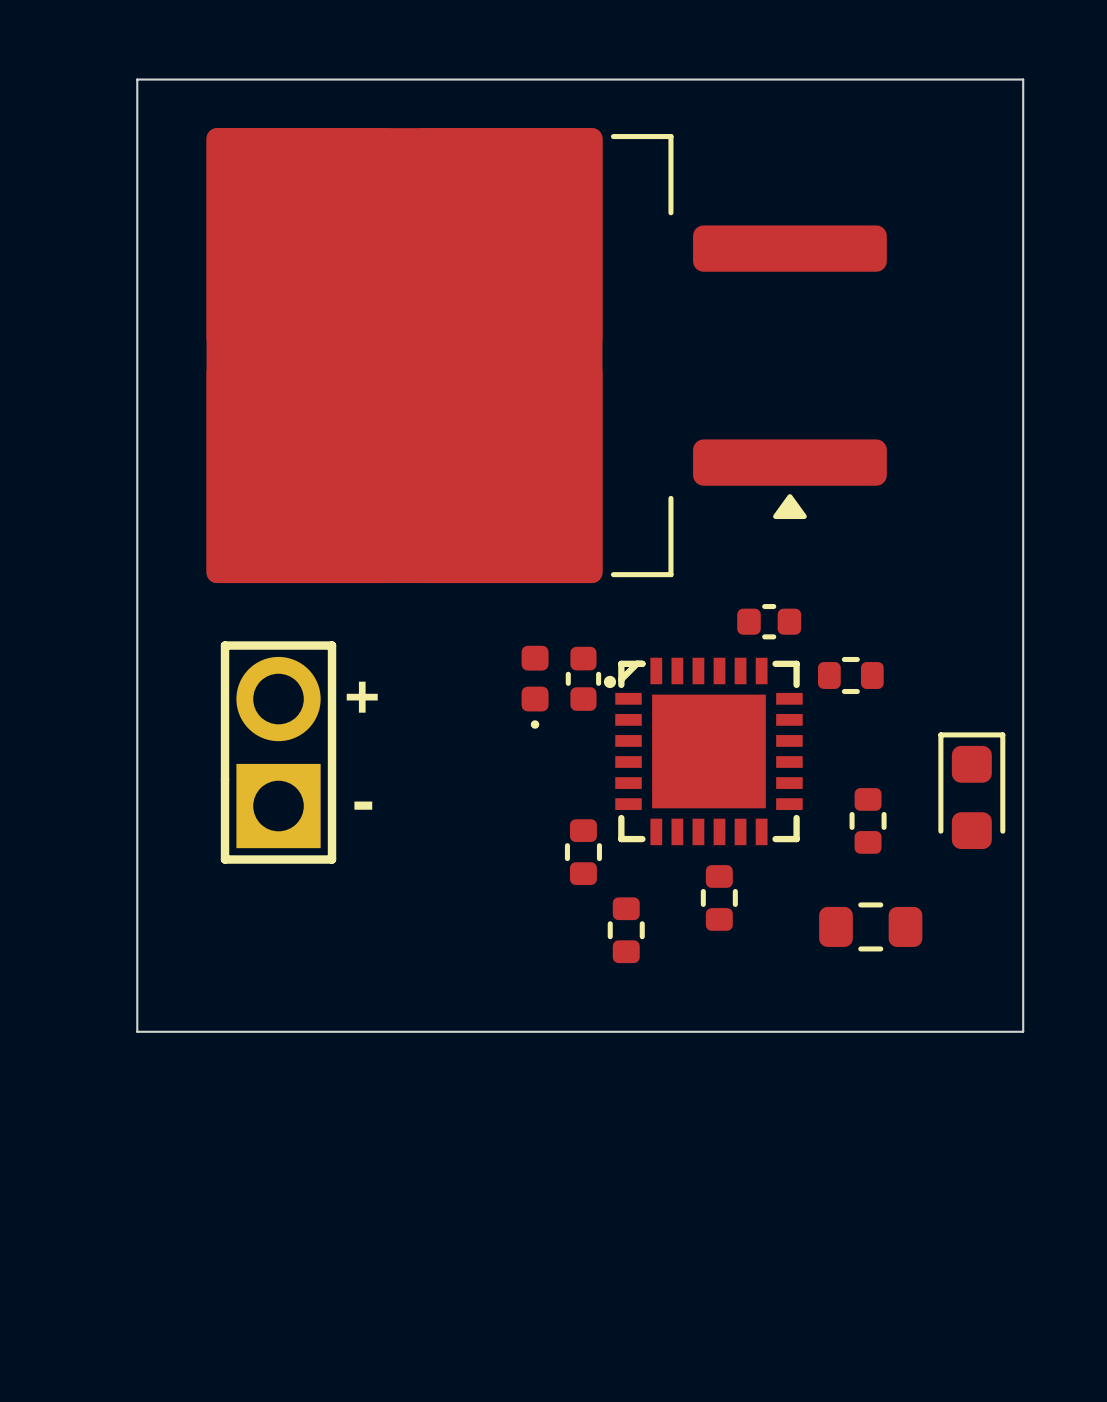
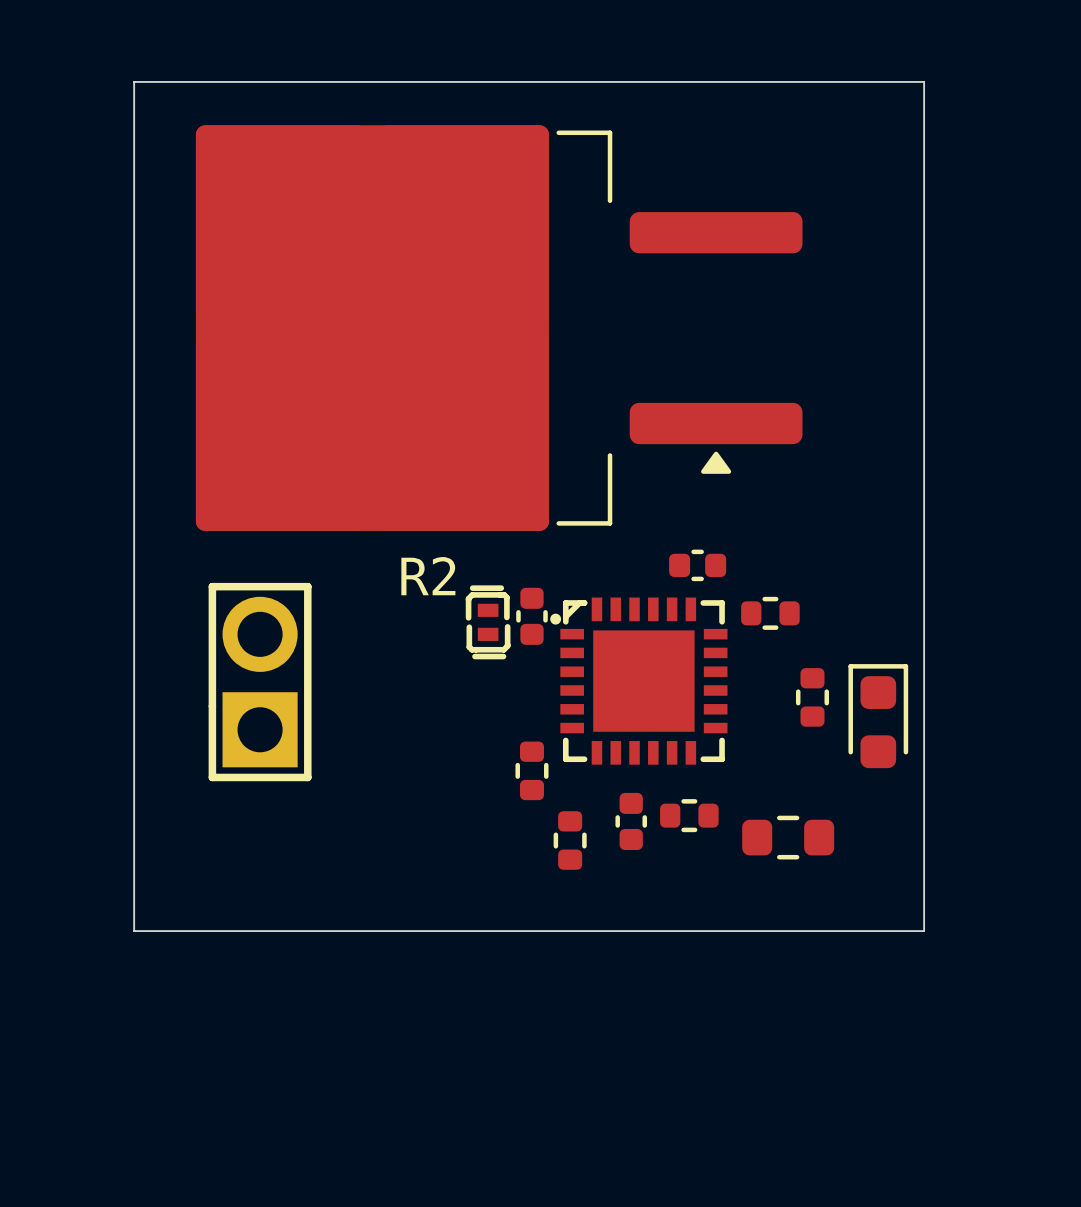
R2 name: none -> R2 (428, 576)
part footprint: [521, 645, 549, 729] -> [465, 585, 511, 660]
text: + (362, 697) -> none
text: - (363, 805) -> none
part position: (868, 820) -> (812, 697)
part rotation: 0° (719, 897) -> 90° clockwise (689, 815)
part position: (719, 897) -> (689, 815)
part: none -> (631, 821)

